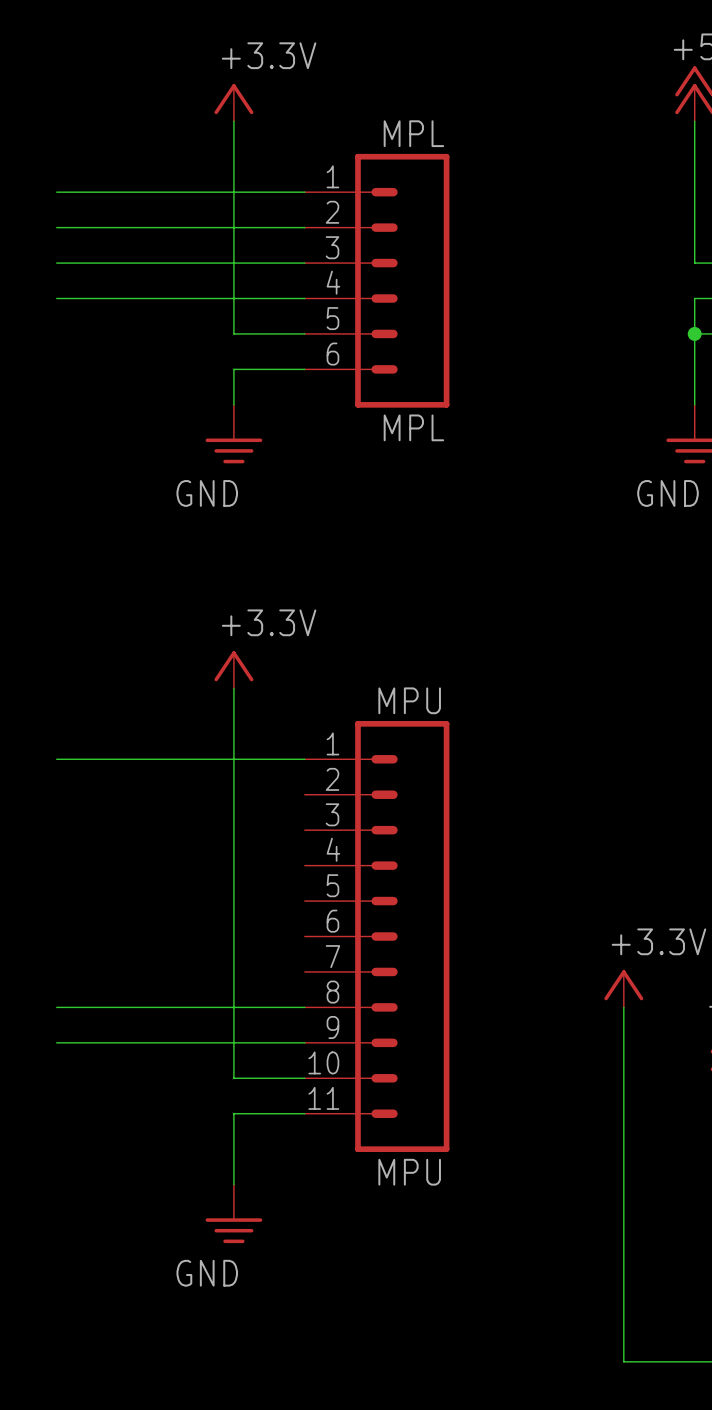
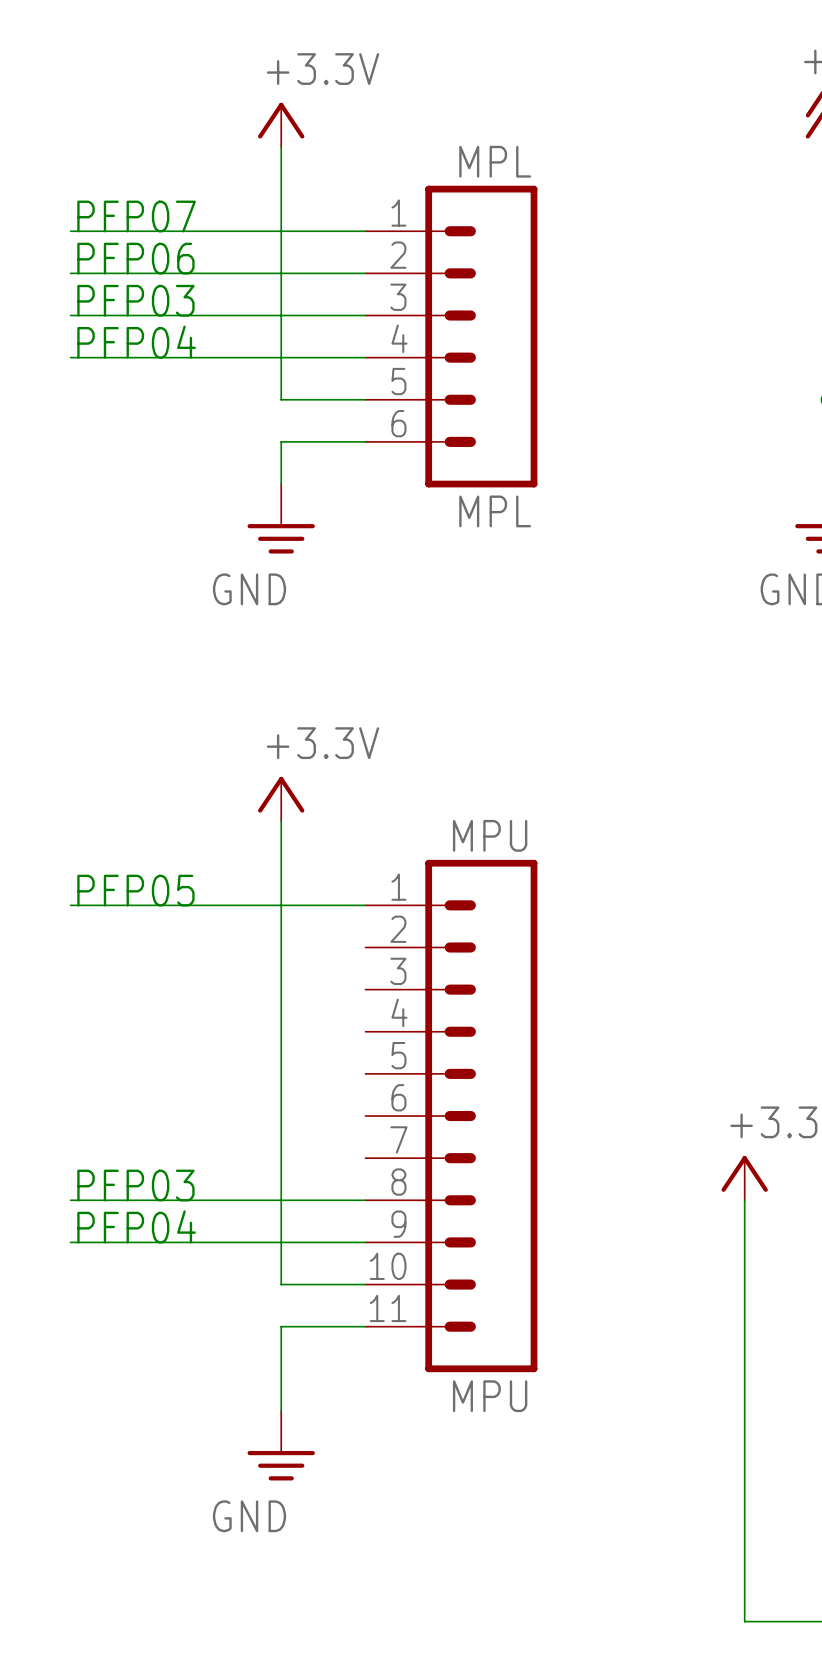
text: none -> PFP07 (136, 216)
text: none -> PFP06 (135, 258)
text: none -> PFP03 (135, 300)
text: none -> PFP04 (136, 342)
text: none -> PFP05 (135, 890)
text: none -> PFP03 (135, 1185)
text: none -> PFP04 (136, 1226)

